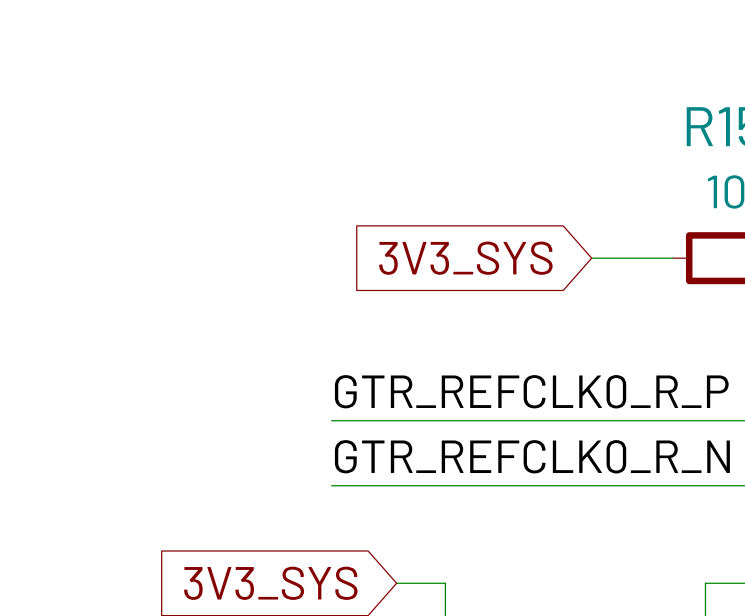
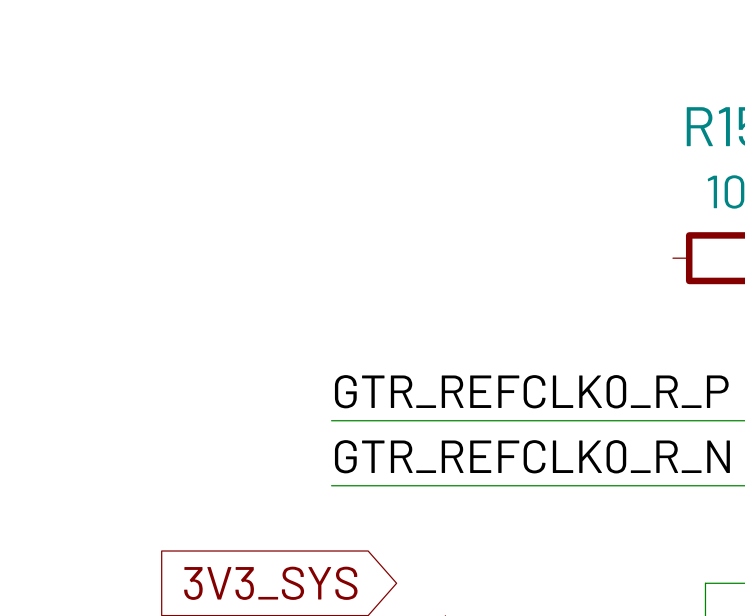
global label: 3V3_SYS (465, 258) -> none
wire: (591, 258) (672, 258) -> none
wire: (396, 583) (445, 583) (445, 615) -> none

